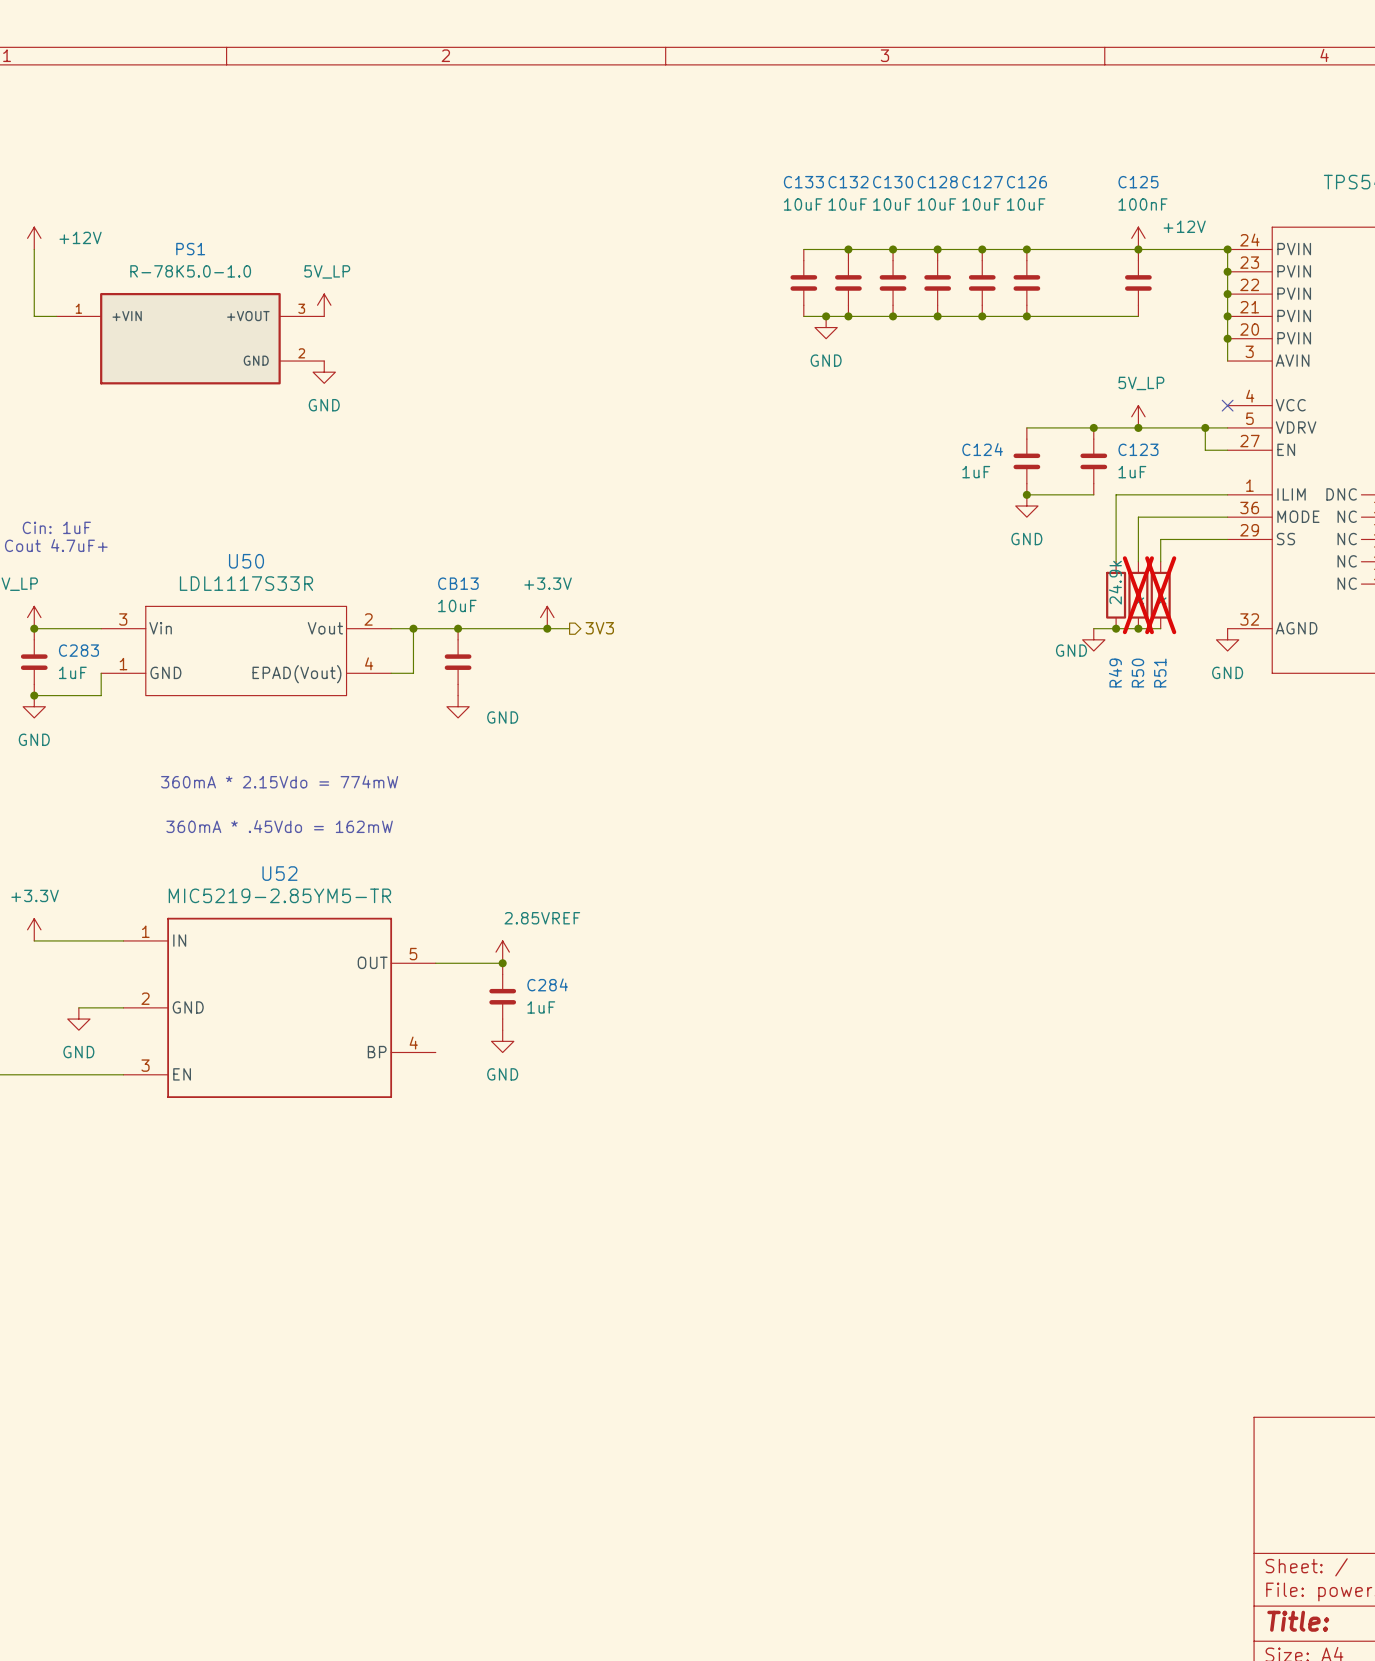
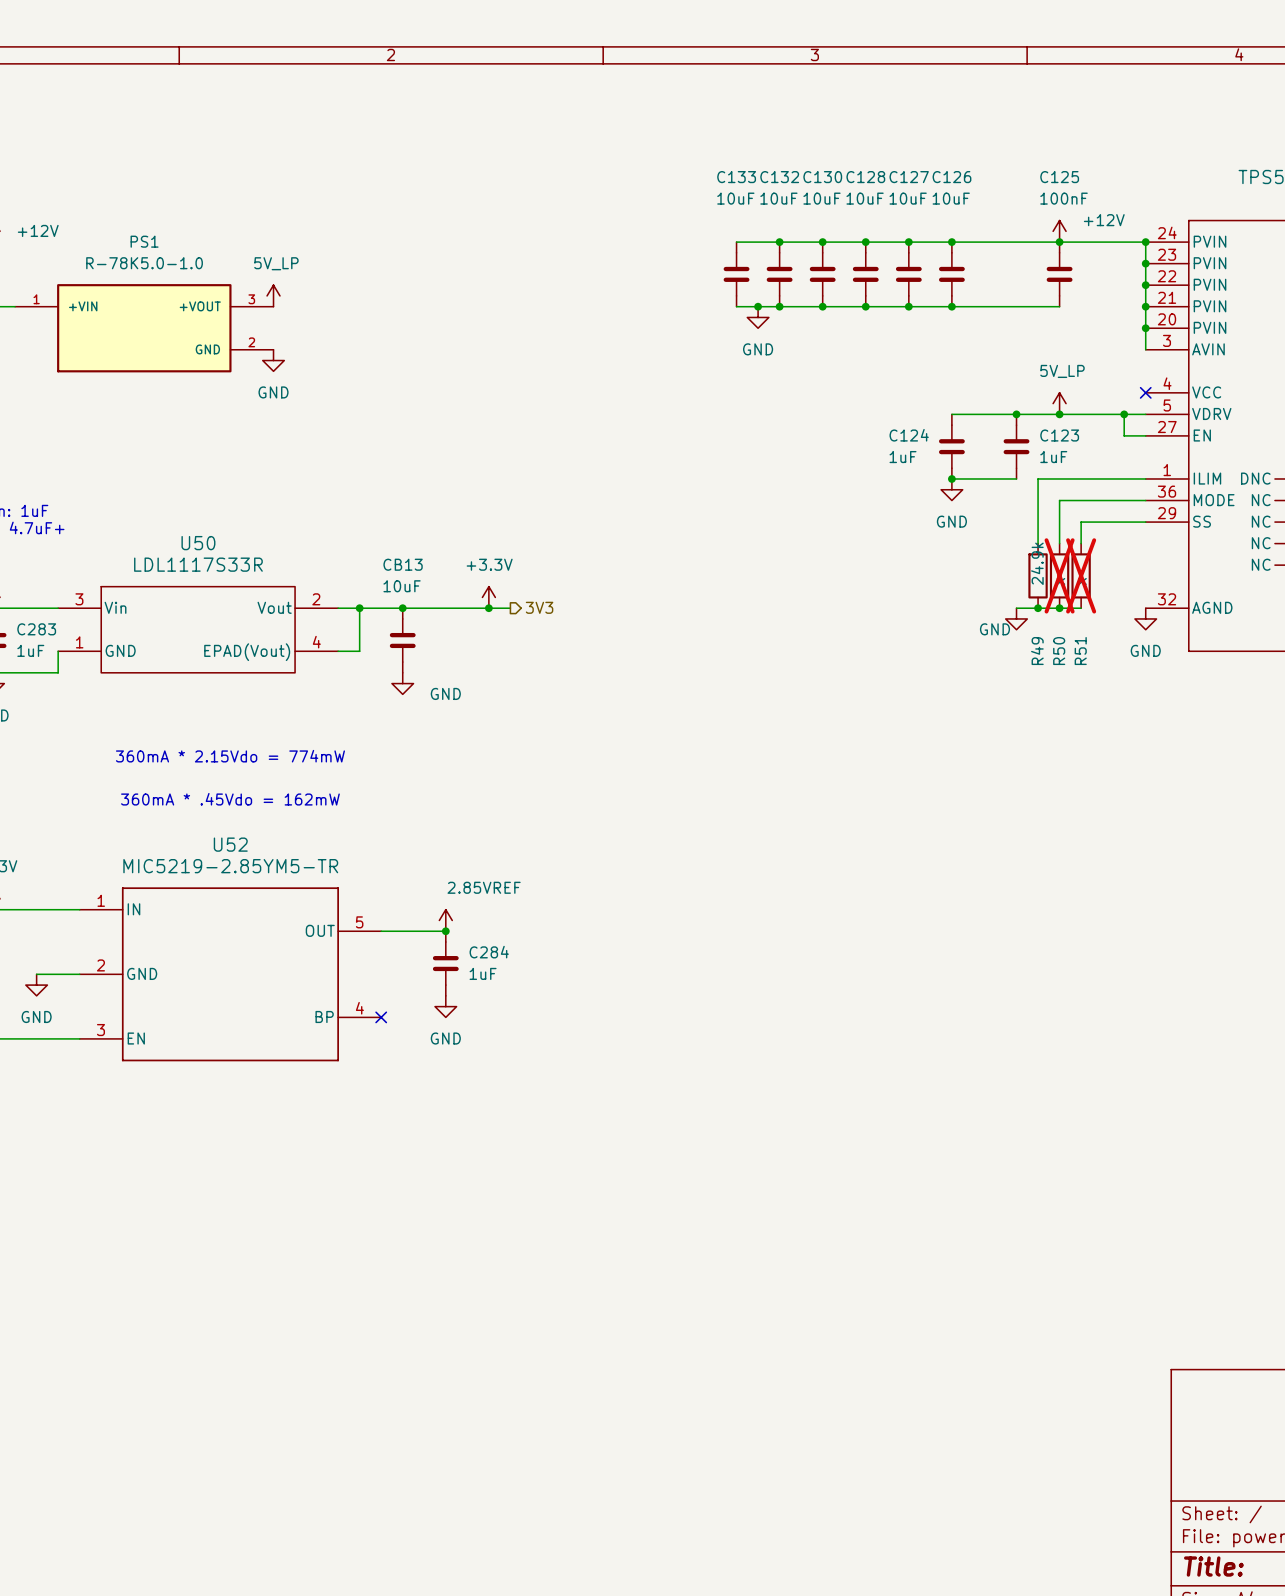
no-connect mark: none -> (381, 1017)

